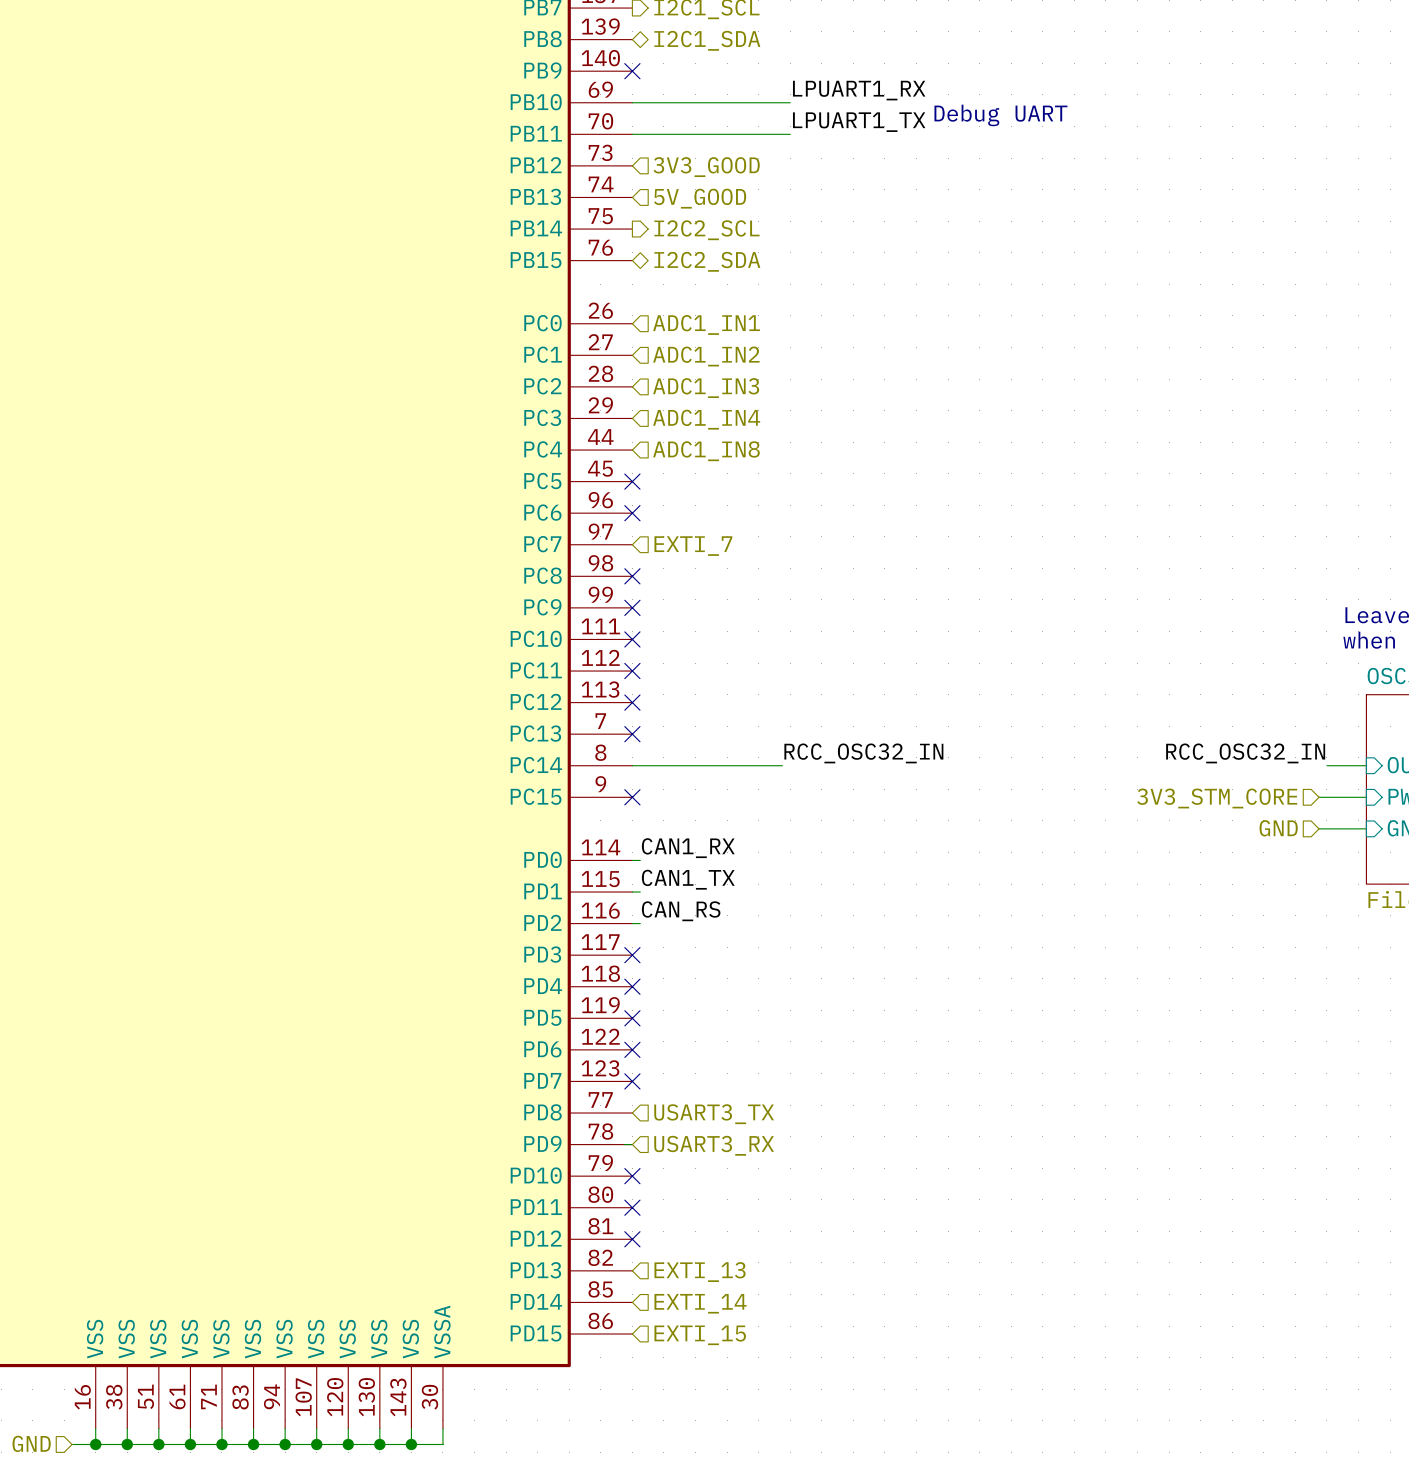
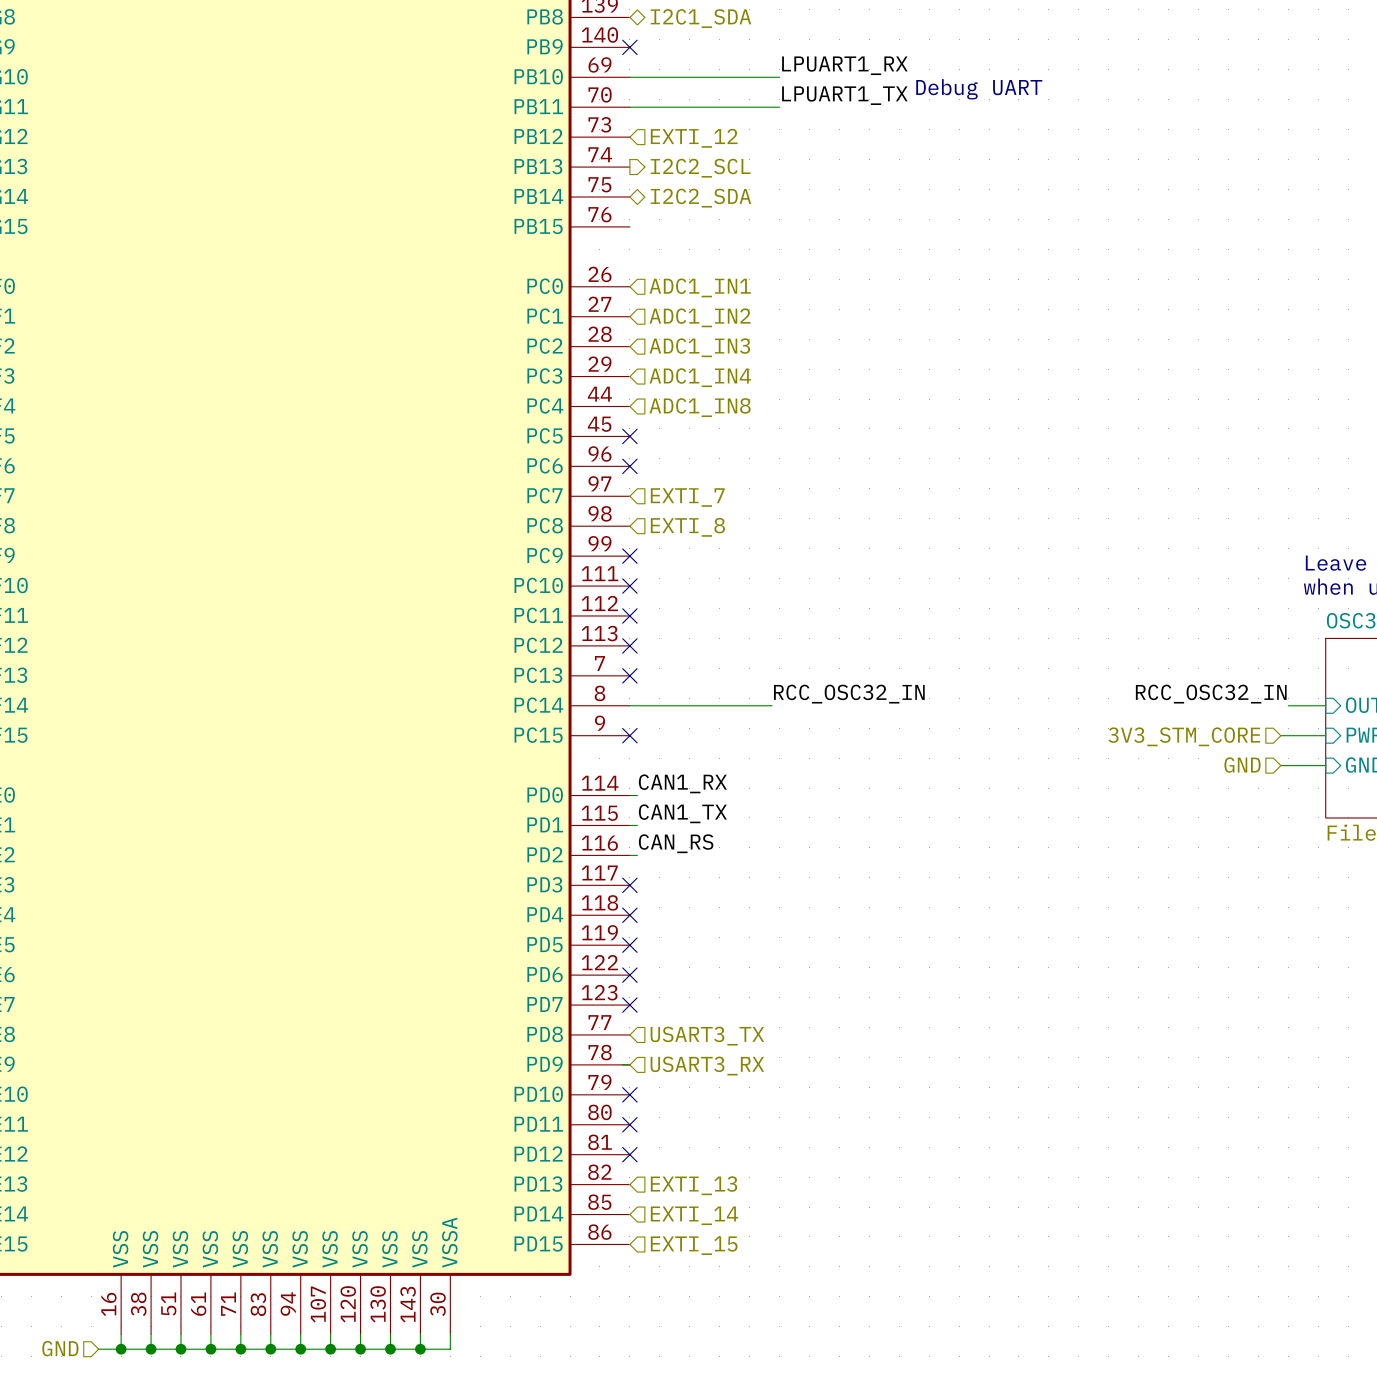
hierarchical label: 3V3_GOOD (706, 167) -> EXTI_12 (694, 138)
hierarchical label shape: input (700, 198) -> output (700, 168)
hierarchical label: 5V_GOOD (700, 198) -> I2C2_SCL (700, 168)
hierarchical label shape: output (706, 230) -> bidirectional (700, 198)
hierarchical label: I2C2_SCL (706, 230) -> I2C2_SDA (700, 198)
hierarchical label: I2C2_SDA (707, 261) -> none
no-connect mark: (632, 576) -> none
hierarchical label: none -> EXTI_8 (687, 527)

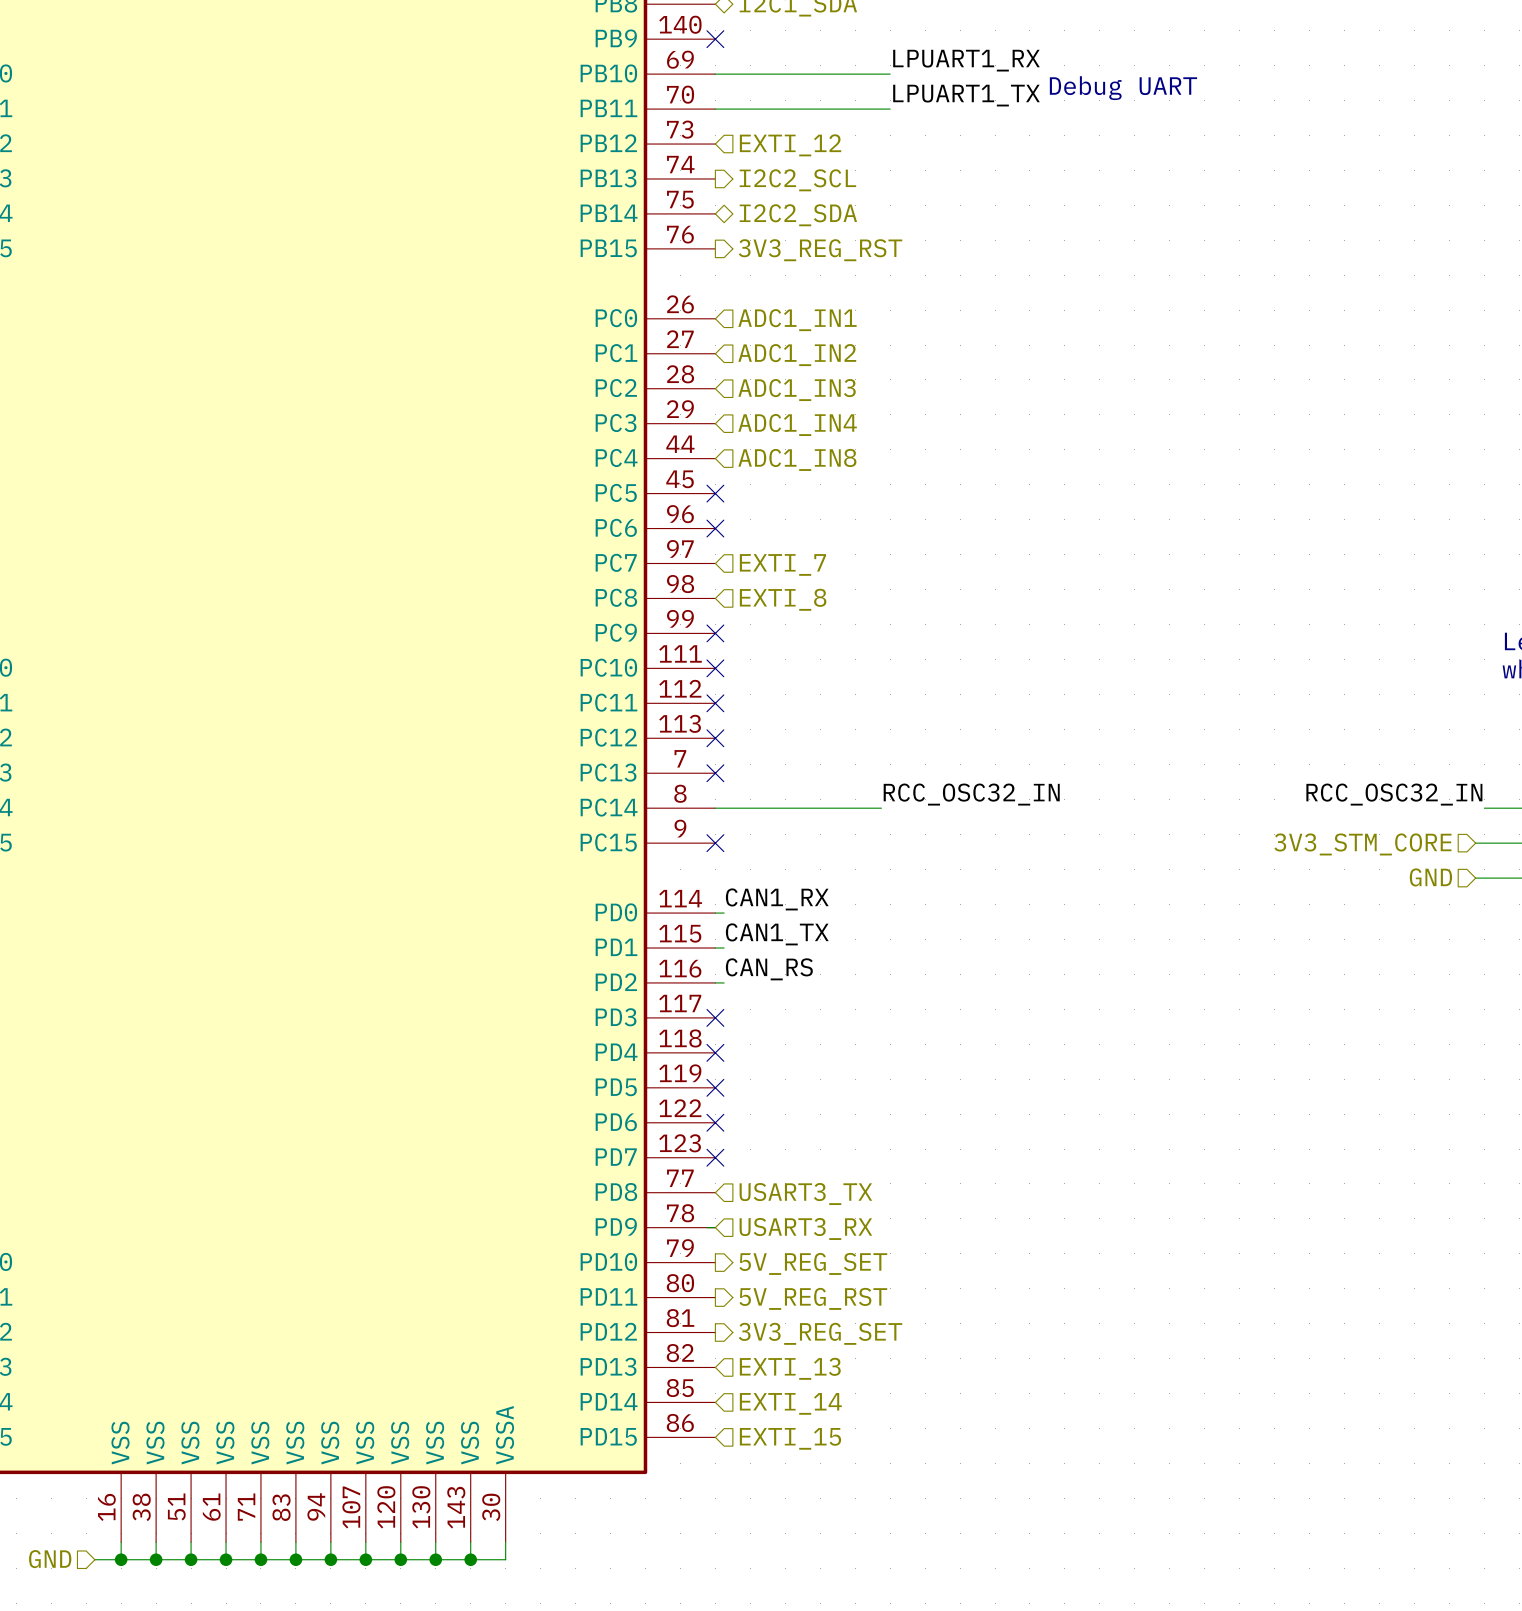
hierarchical label: none -> 3V3_REG_RST (820, 250)
no-connect mark: (629, 1094) -> none
hierarchical label: none -> 5V_REG_SET (813, 1263)
no-connect mark: (629, 1124) -> none
hierarchical label: none -> 5V_REG_RST (813, 1298)
no-connect mark: (629, 1154) -> none
hierarchical label: none -> 3V3_REG_SET (820, 1333)

